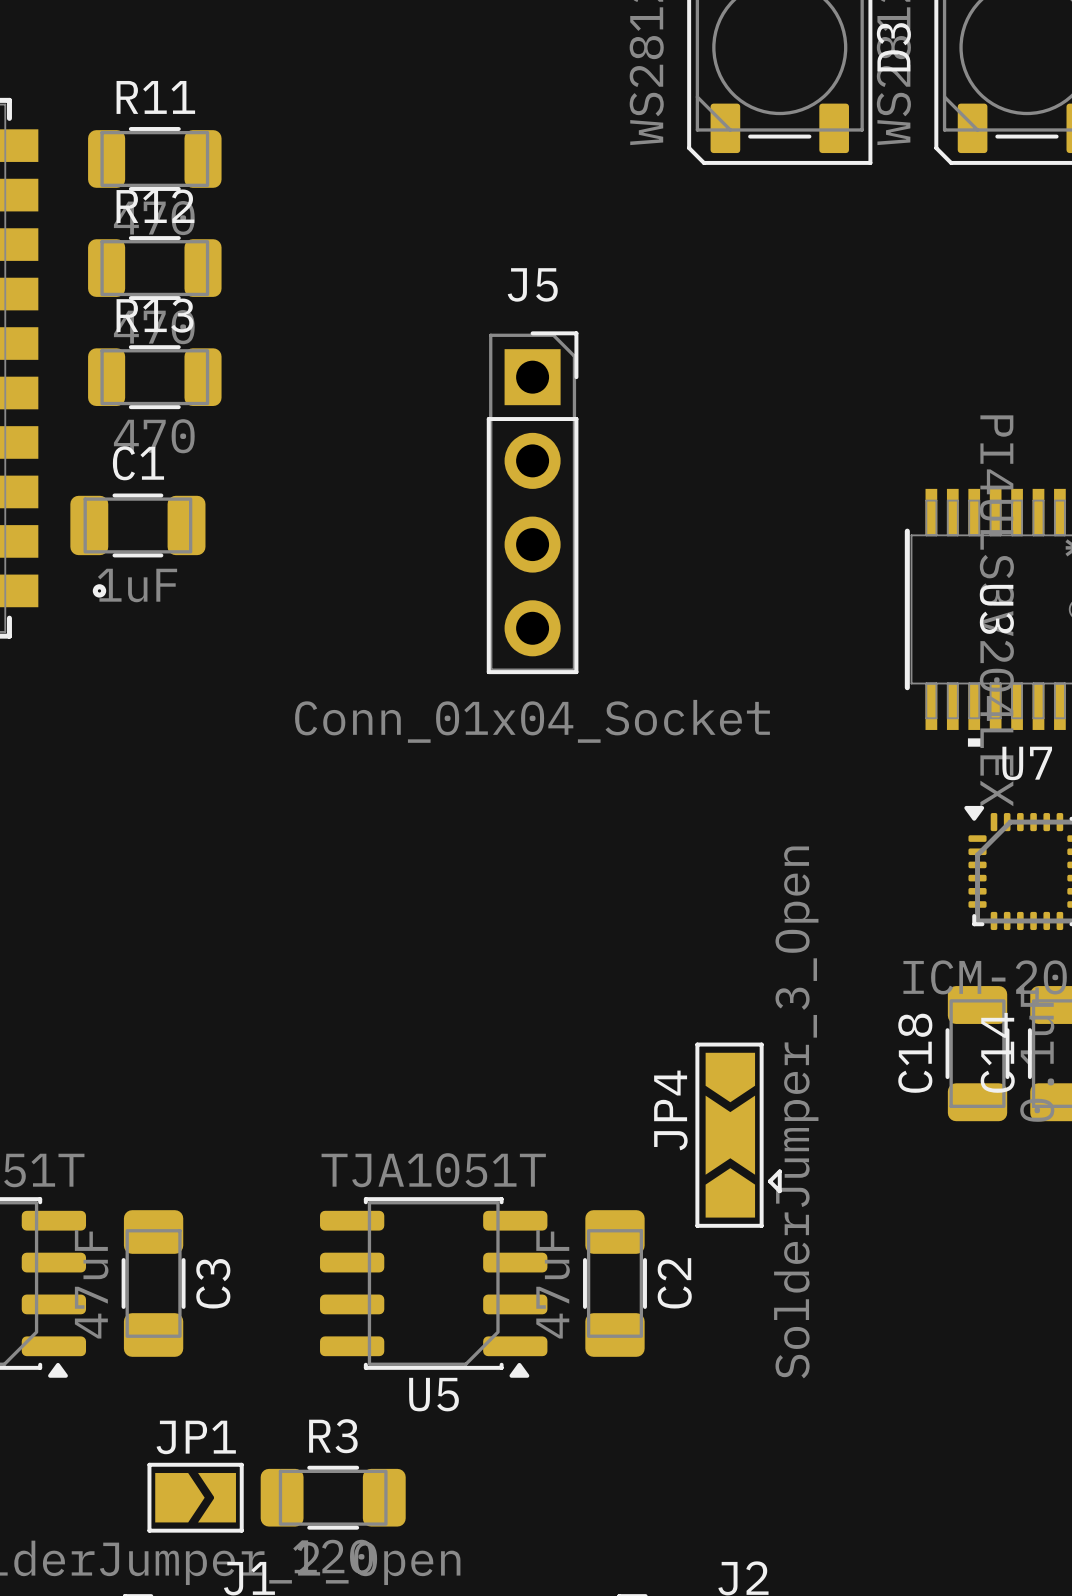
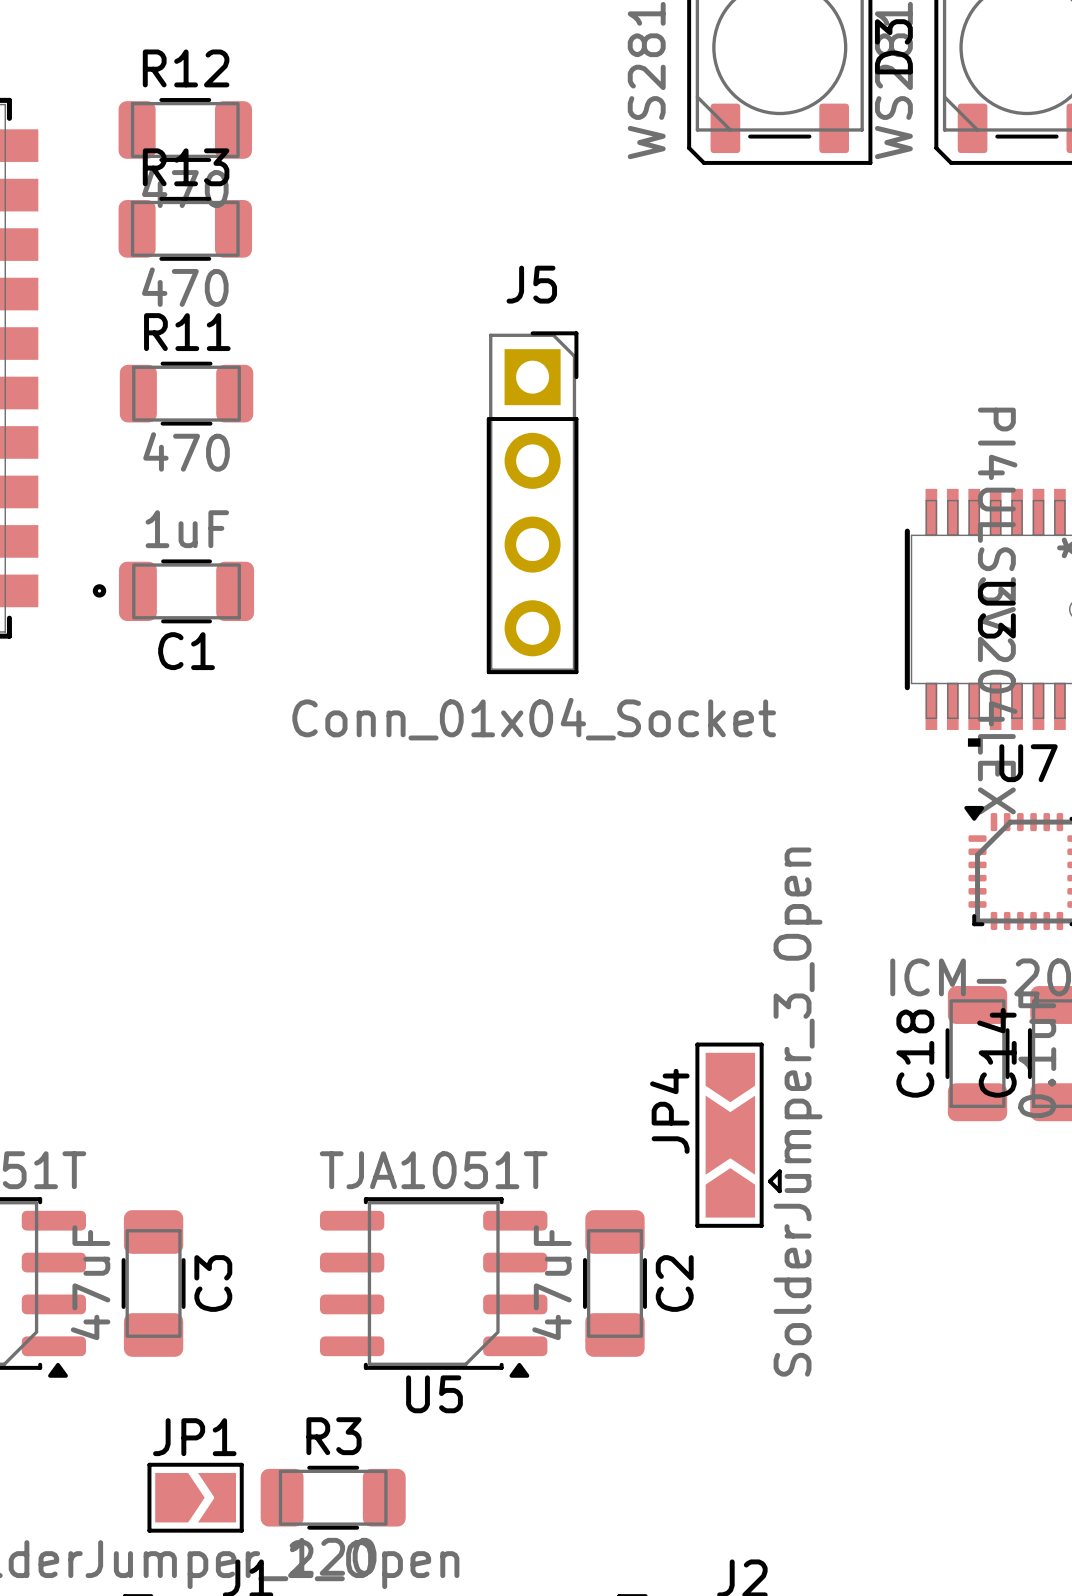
R11 position: (154, 158) -> (186, 393)
R12 position: (154, 268) -> (185, 129)
R13 position: (154, 377) -> (185, 228)
C1 name position: C1 (138, 463) -> C1 (186, 651)
C1 position: (137, 525) -> (186, 591)
C1 value position: 1uF (137, 585) -> 1uF (187, 529)

